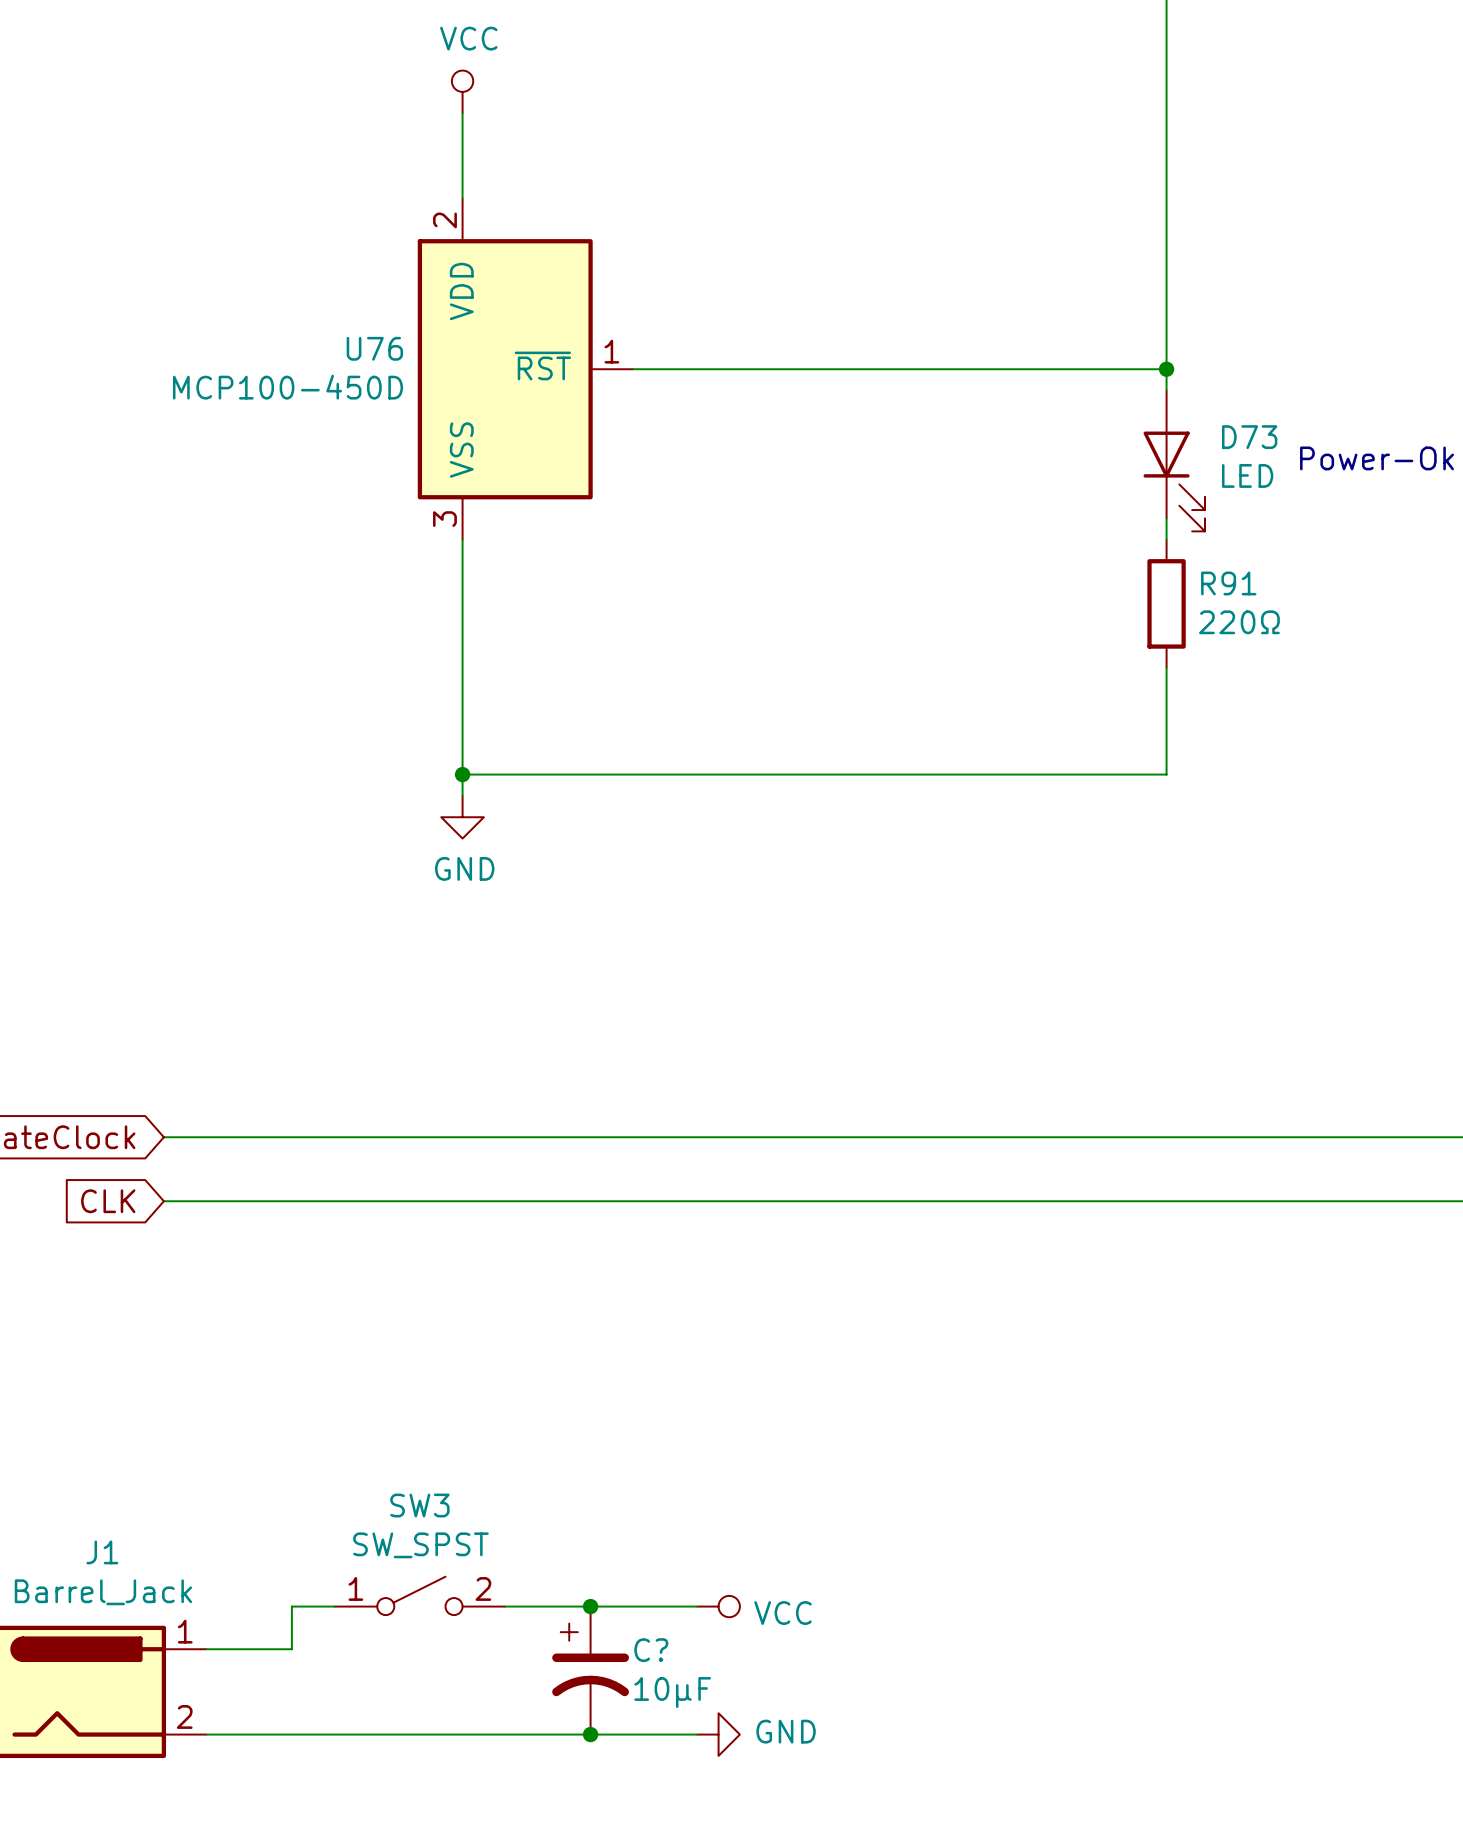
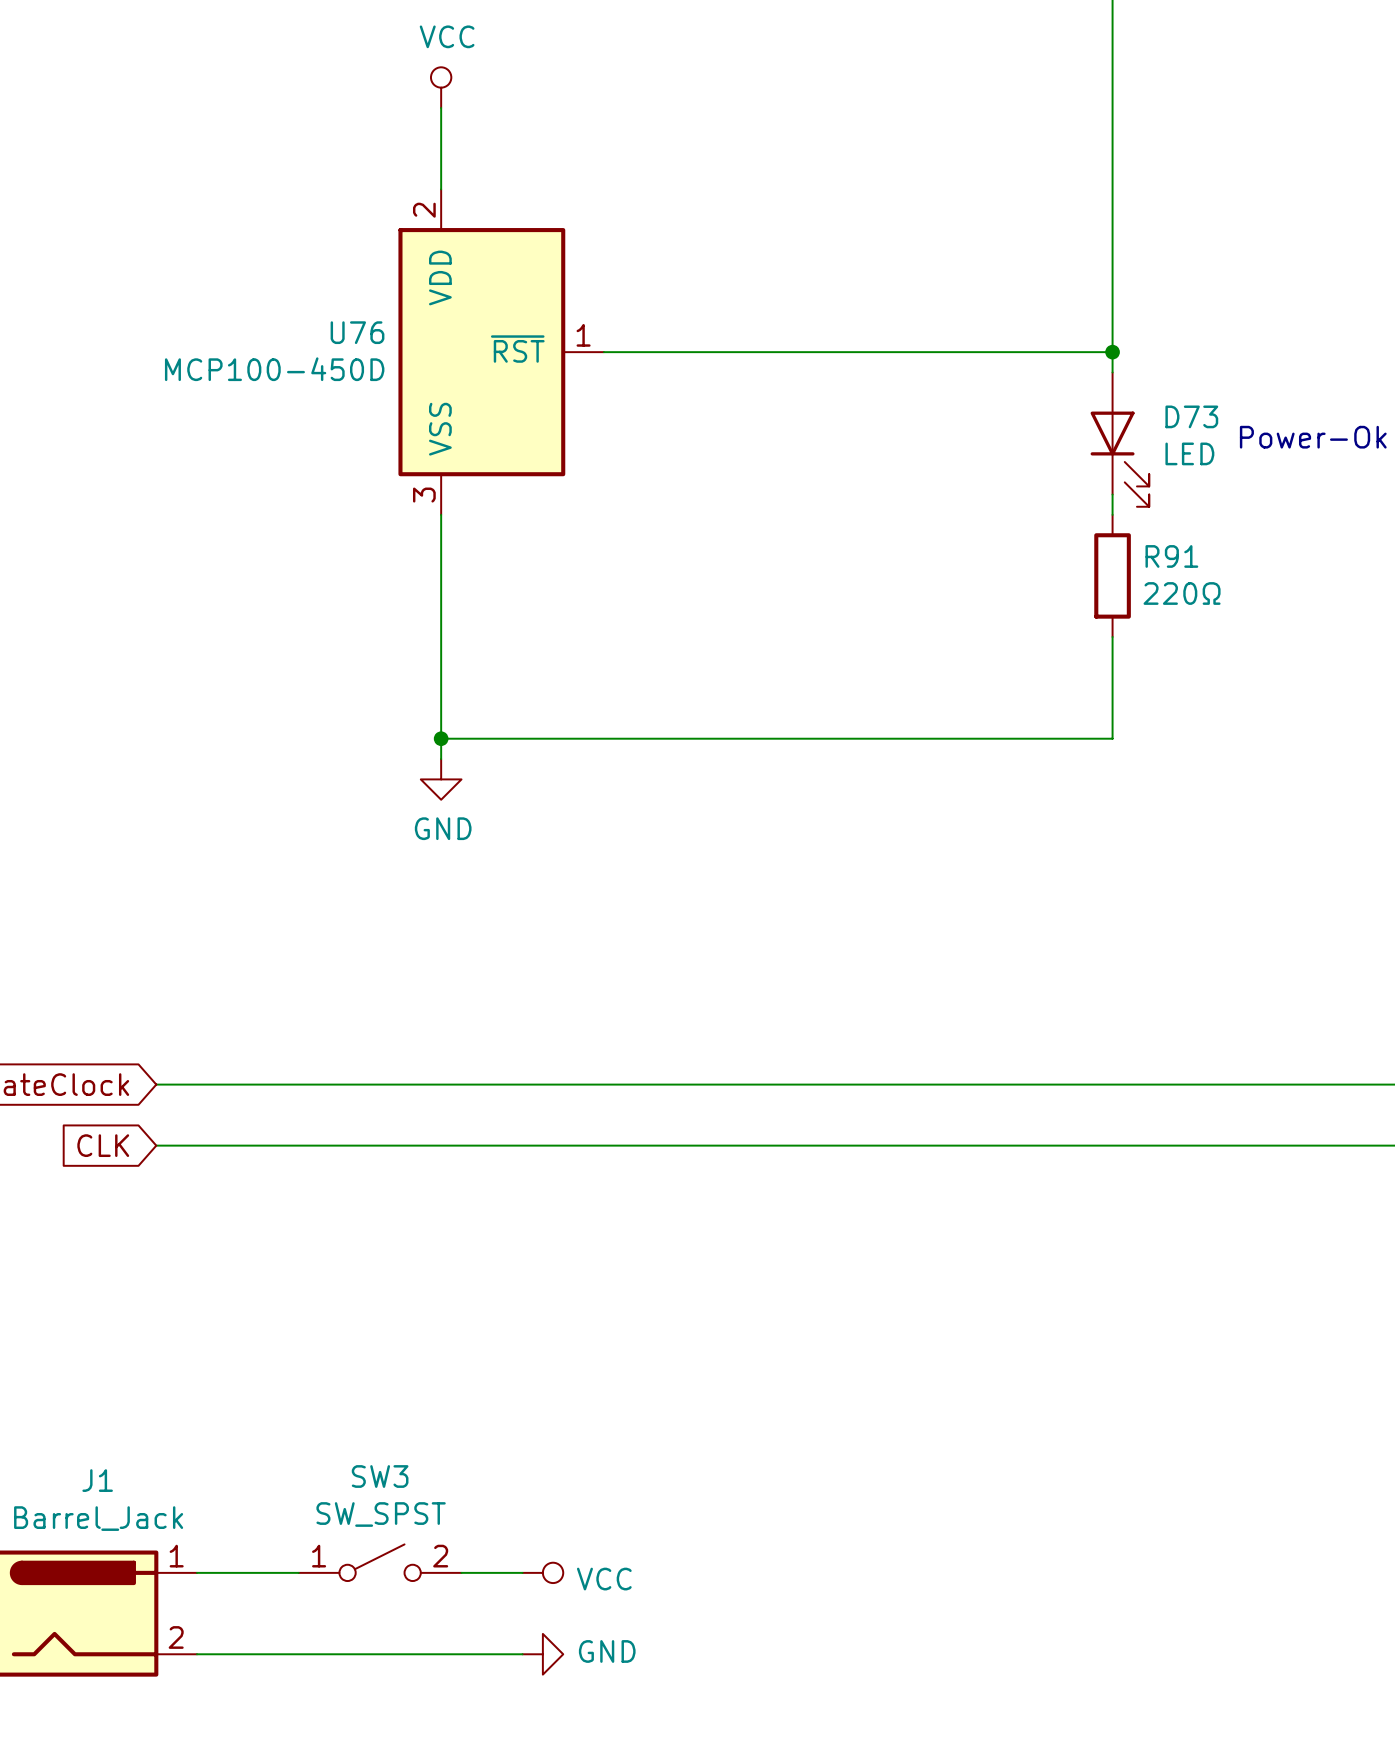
SW3 position: (419, 1595) -> (380, 1562)
wire: (334, 1606) (291, 1606) (291, 1649) -> (298, 1572) (278, 1572)
wire: (505, 1606) (697, 1606) -> none
junction: (590, 1606) -> none
power symbol position: VCC (718, 1606) -> VCC (542, 1572)
wire: none -> (461, 1572) (522, 1572)
C?: 10µF (590, 1670) -> none
wire: (547, 1734) (697, 1734) -> none
junction: (590, 1734) -> none
power symbol position: GND (718, 1734) -> GND (542, 1654)

